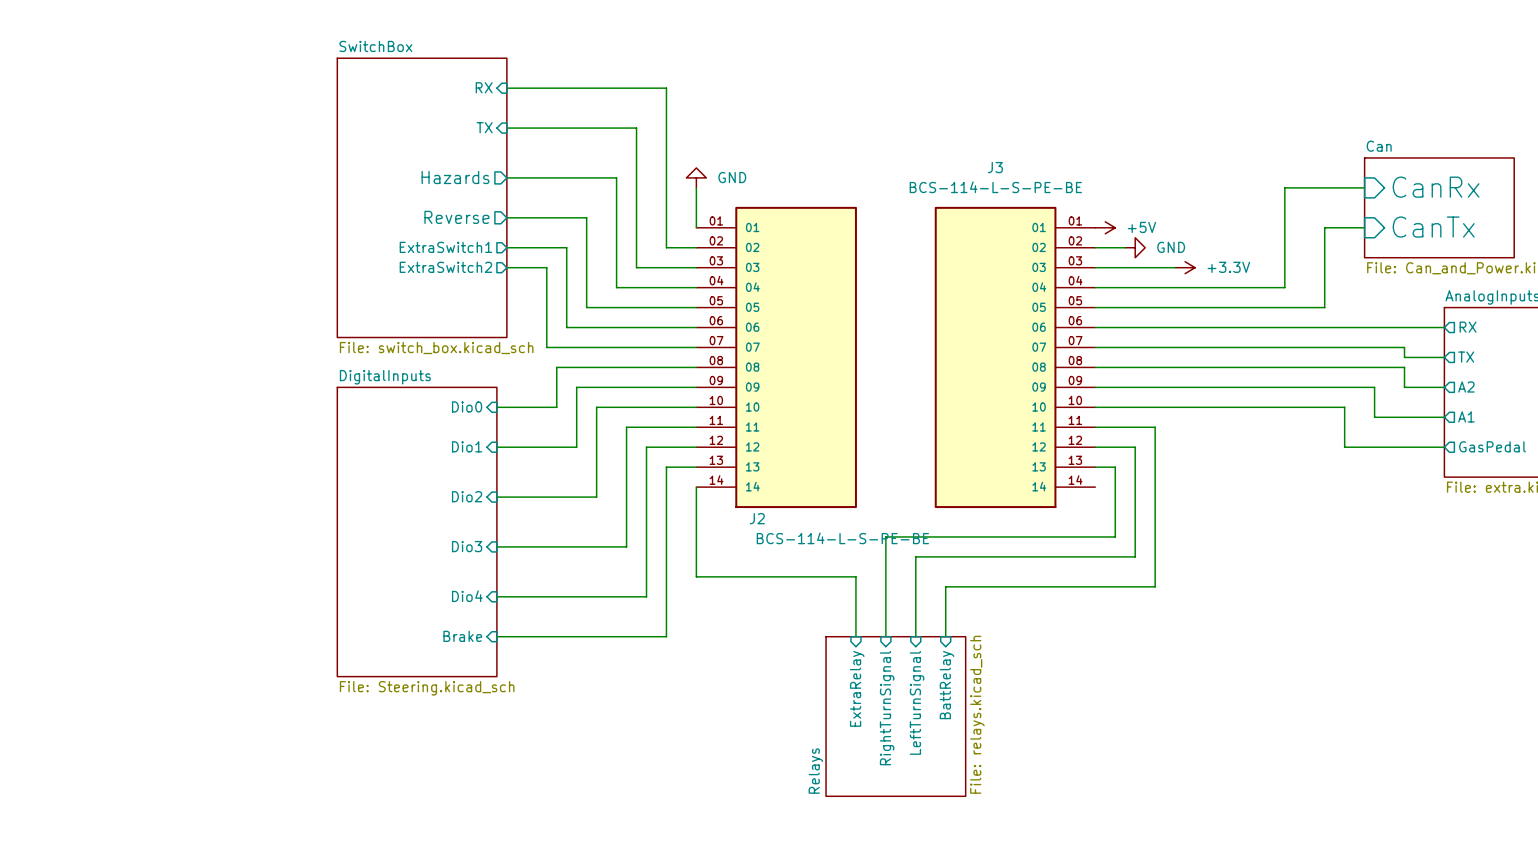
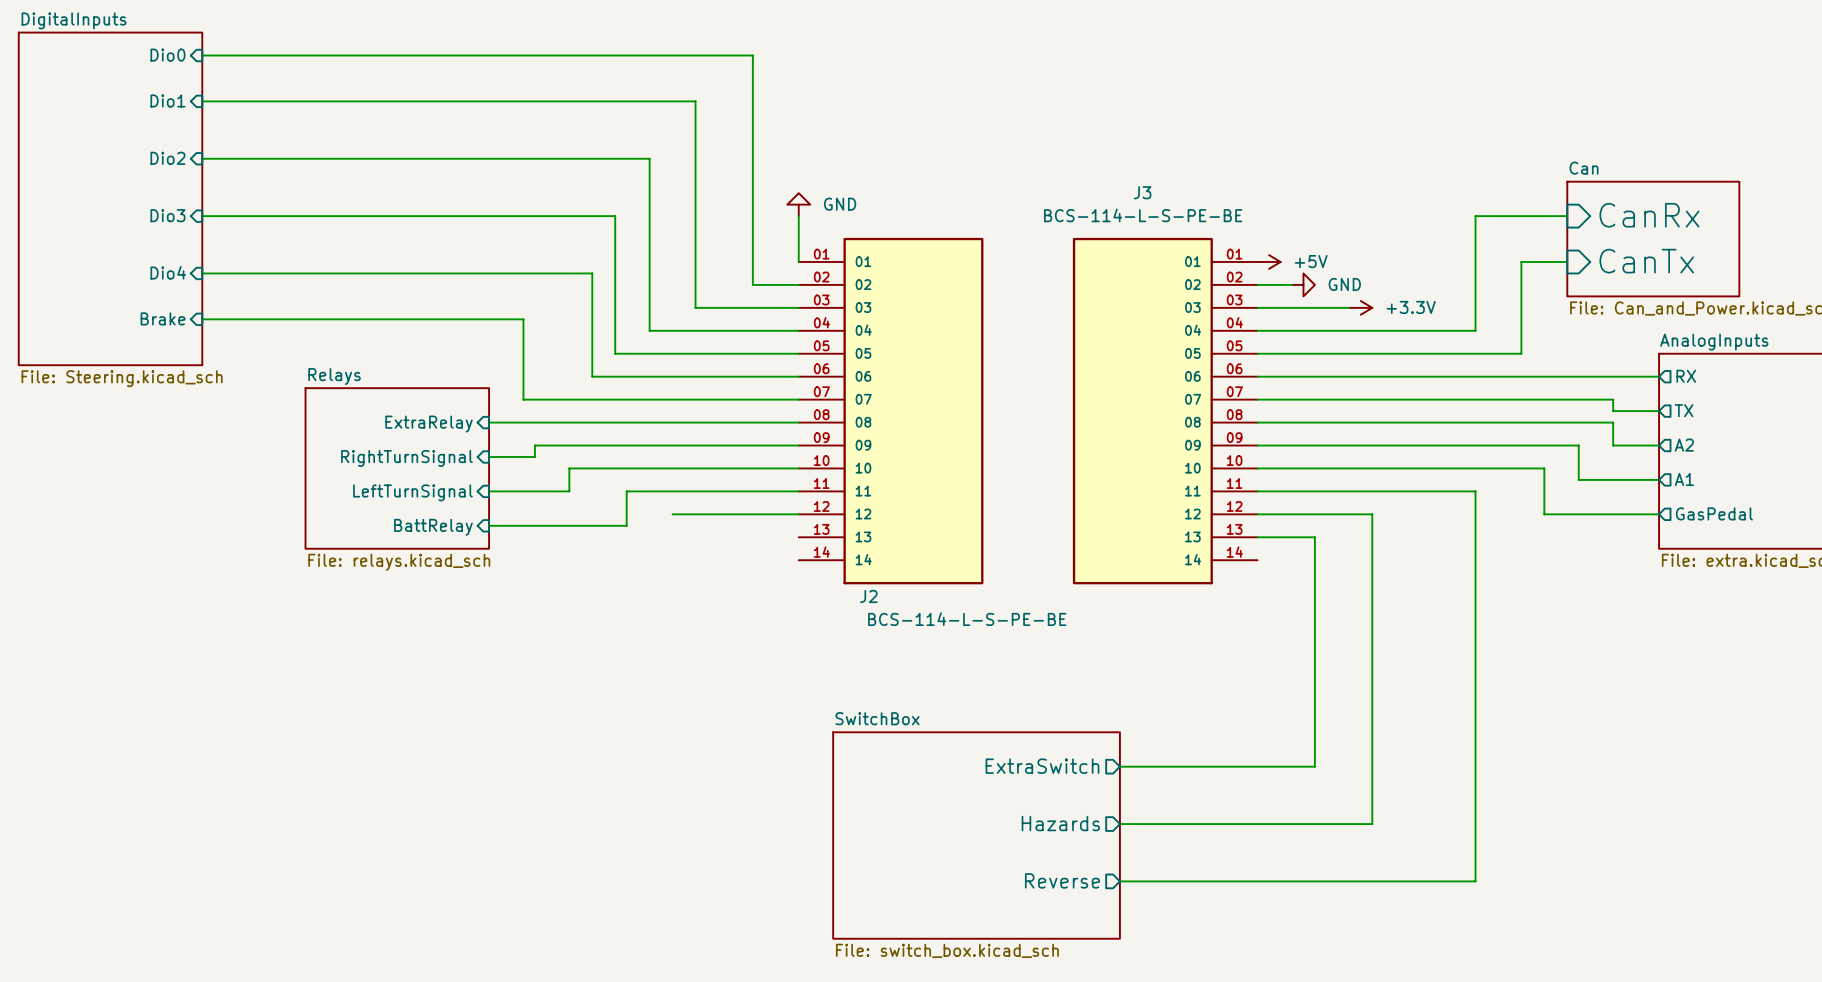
sheet pin: none -> Dio0 (167, 55)
wire: none -> (202, 55) (752, 55) (752, 284) (764, 284)
sheet pin: none -> Dio1 (167, 100)
sheet pin: RX (484, 87) -> none
wire: none -> (202, 101) (580, 101)
wire: (606, 88) (666, 88) (666, 247) -> (695, 101) (695, 307) (729, 307)
sheet pin: TX (484, 127) -> none
wire: (506, 128) (636, 128) (636, 267) -> none
sheet pin: none -> Dio2 (167, 158)
sheet DigitalInputs: none -> File: Steering.kicad_sch (110, 198)
sheet pin: Hazards (455, 177) -> none
wire: (506, 177) (616, 177) (616, 287) -> none
sheet pin: none -> Dio3 (167, 215)
sheet SwitchBox: File: switch_box.kicad_sch (422, 197) -> none
sheet pin: Reverse (456, 217) -> none
wire: (506, 217) (586, 217) (586, 307) -> (202, 216) (615, 216) (615, 353) (672, 353)
sheet pin: none -> Dio4 (168, 272)
wire: none -> (202, 273) (592, 273) (592, 376) (649, 376)
sheet pin: ExtraSwitch1 (445, 247) -> none
wire: (506, 247) (566, 247) -> (202, 158) (649, 158) (649, 284)
sheet pin: ExtraSwitch2 (445, 267) -> none
wire: (506, 267) (546, 267) (546, 347) -> (202, 319) (523, 319) (523, 399) (626, 399)
sheet pin: none -> Brake (163, 318)
wire: (566, 287) (566, 327) -> (649, 330) (706, 330)
wire: none -> (489, 422) (638, 422)
wire: (556, 367) (556, 407) -> (684, 468) (638, 468)
sheet pin: none -> ExtraRelay (429, 424)
wire: (576, 387) (576, 447) (496, 447) -> (661, 445) (534, 445) (534, 456) (489, 456)
sheet pin: none -> RightTurnSignal (406, 458)
sheet pin: Dio0 (467, 406) -> none
sheet Relays: none -> File: relays.kicad_sch (397, 468)
wire: none -> (569, 468) (569, 491) (489, 491)
wire: (596, 407) (596, 497) (496, 497) -> none
wire: (626, 427) (626, 546) (496, 546) -> (718, 491) (626, 491) (626, 525) (489, 525)
wire: (1155, 427) (1155, 586) (945, 586) (945, 636) -> (1326, 491) (1475, 491) (1475, 881) (1119, 881)
sheet pin: none -> LeftTurnSignal (412, 492)
sheet pin: Dio1 (467, 446) -> none
wire: (646, 447) (646, 596) (496, 596) -> (741, 514) (672, 514)
wire: (1135, 447) (1135, 556) (915, 556) (915, 636) -> (1303, 514) (1372, 514) (1372, 824) (1119, 824)
sheet pin: none -> BattRelay (433, 527)
wire: (696, 467) (666, 467) (666, 636) (496, 636) -> none
wire: (1115, 467) (1115, 536) (885, 536) (885, 636) -> (1280, 537) (1314, 537) (1314, 766) (1119, 766)
wire: (696, 487) (696, 576) (855, 576) (855, 636) -> none
sheet pin: Dio2 (467, 496) -> none
sheet DigitalInputs: File: Steering.kicad_sch (417, 531) -> none
sheet pin: Dio3 (467, 546) -> none
sheet pin: Dio4 (467, 596) -> none
sheet pin: Brake (462, 636) -> none
sheet pin: none -> ExtraSwitch (1042, 766)
sheet pin: BattRelay (947, 685) -> none
sheet pin: ExtraRelay (857, 688) -> none
sheet pin: LeftTurnSignal (917, 702) -> none
sheet pin: RightTurnSignal (887, 708) -> none
sheet Relays: File: relays.kicad_sch (895, 716) -> none
sheet pin: none -> Hazards (1060, 823)
sheet SwitchBox: none -> File: switch_box.kicad_sch (976, 835)
sheet pin: none -> Reverse (1062, 880)

